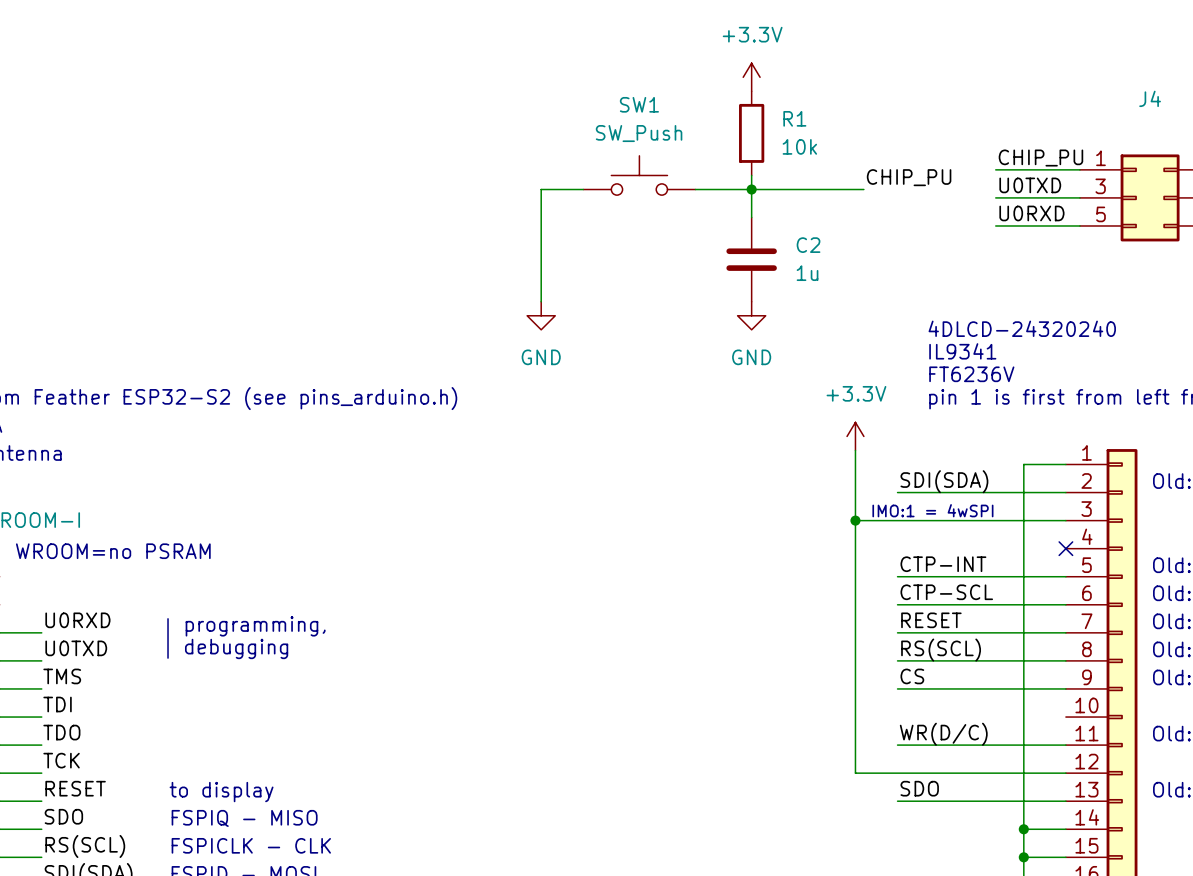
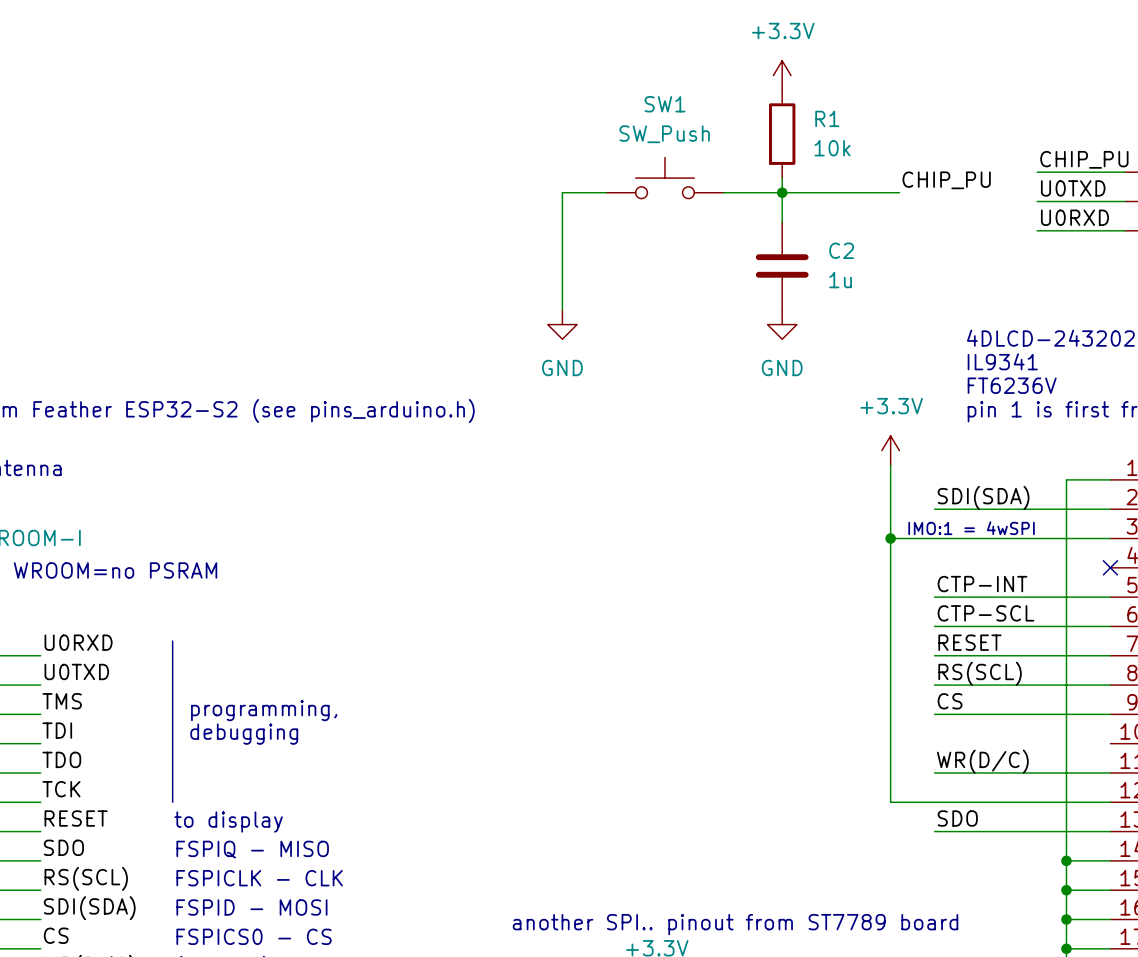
text position: programming, (255, 626) -> programming, (264, 710)
text position: debugging (236, 648) -> debugging (244, 734)
line: none -> (172, 682) (172, 802)

